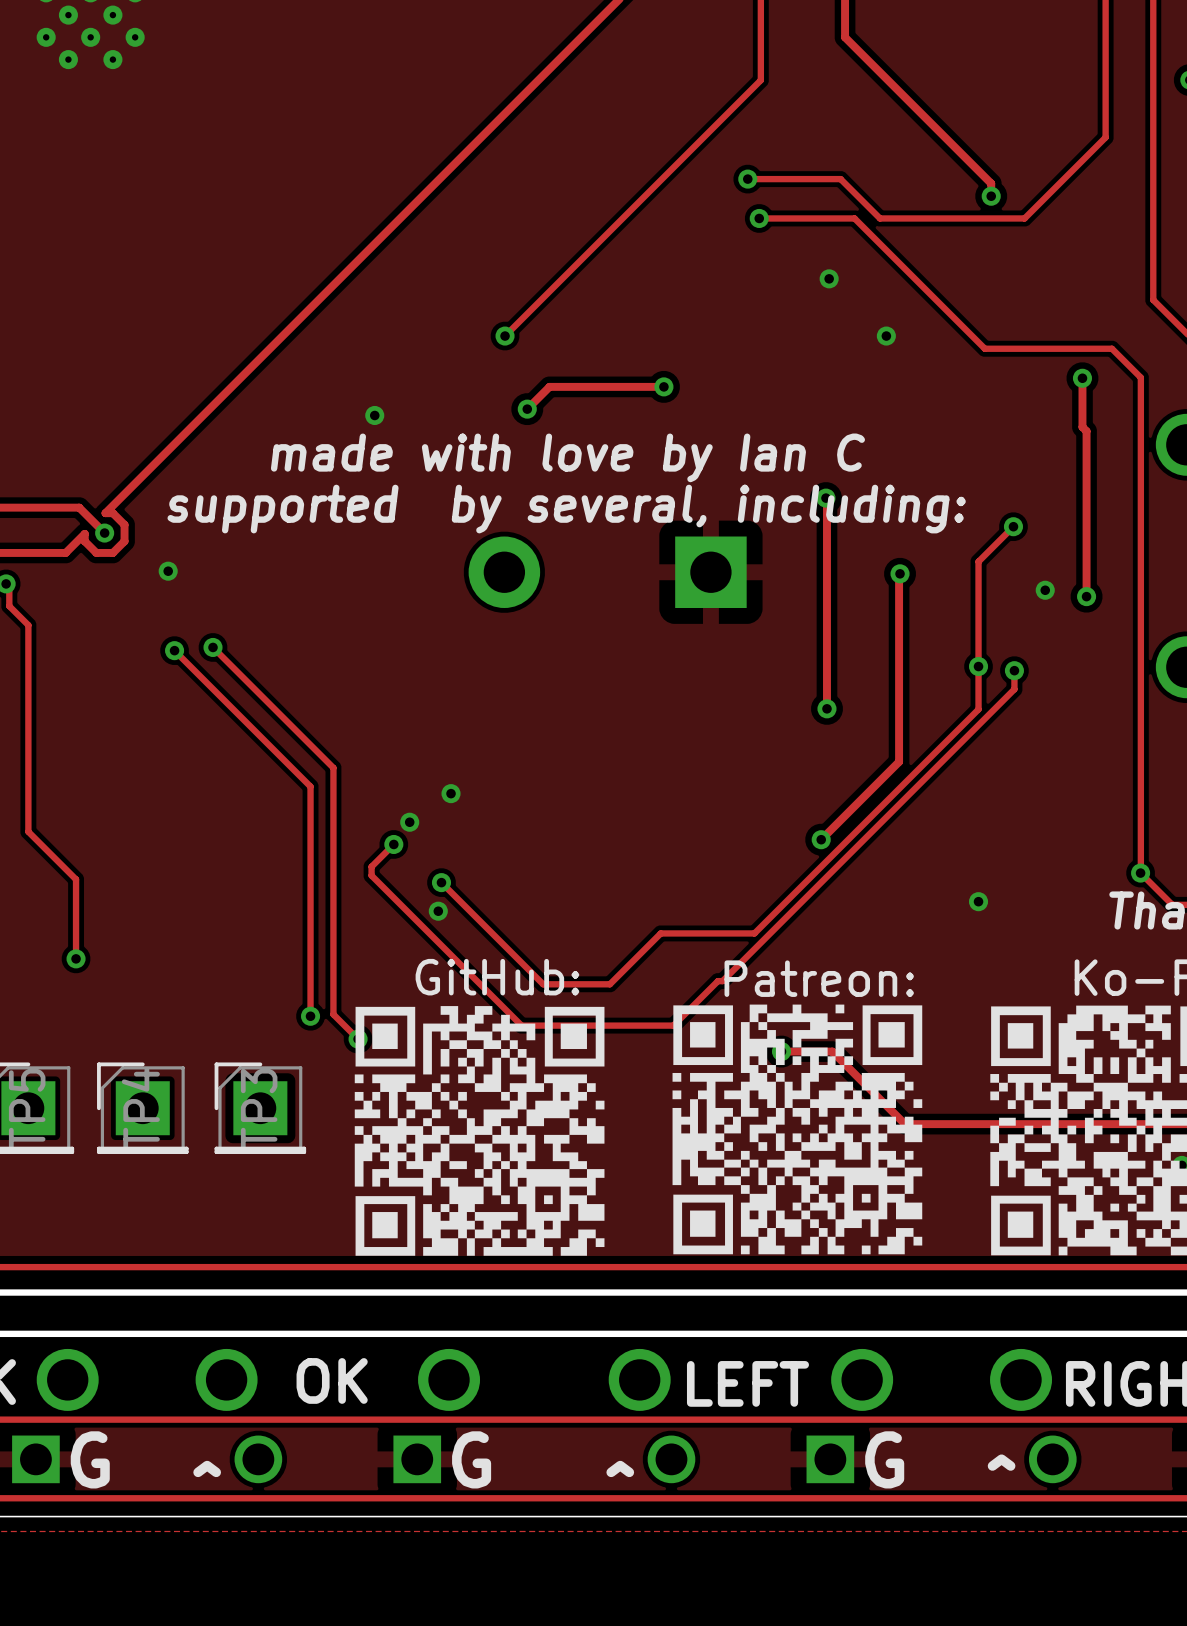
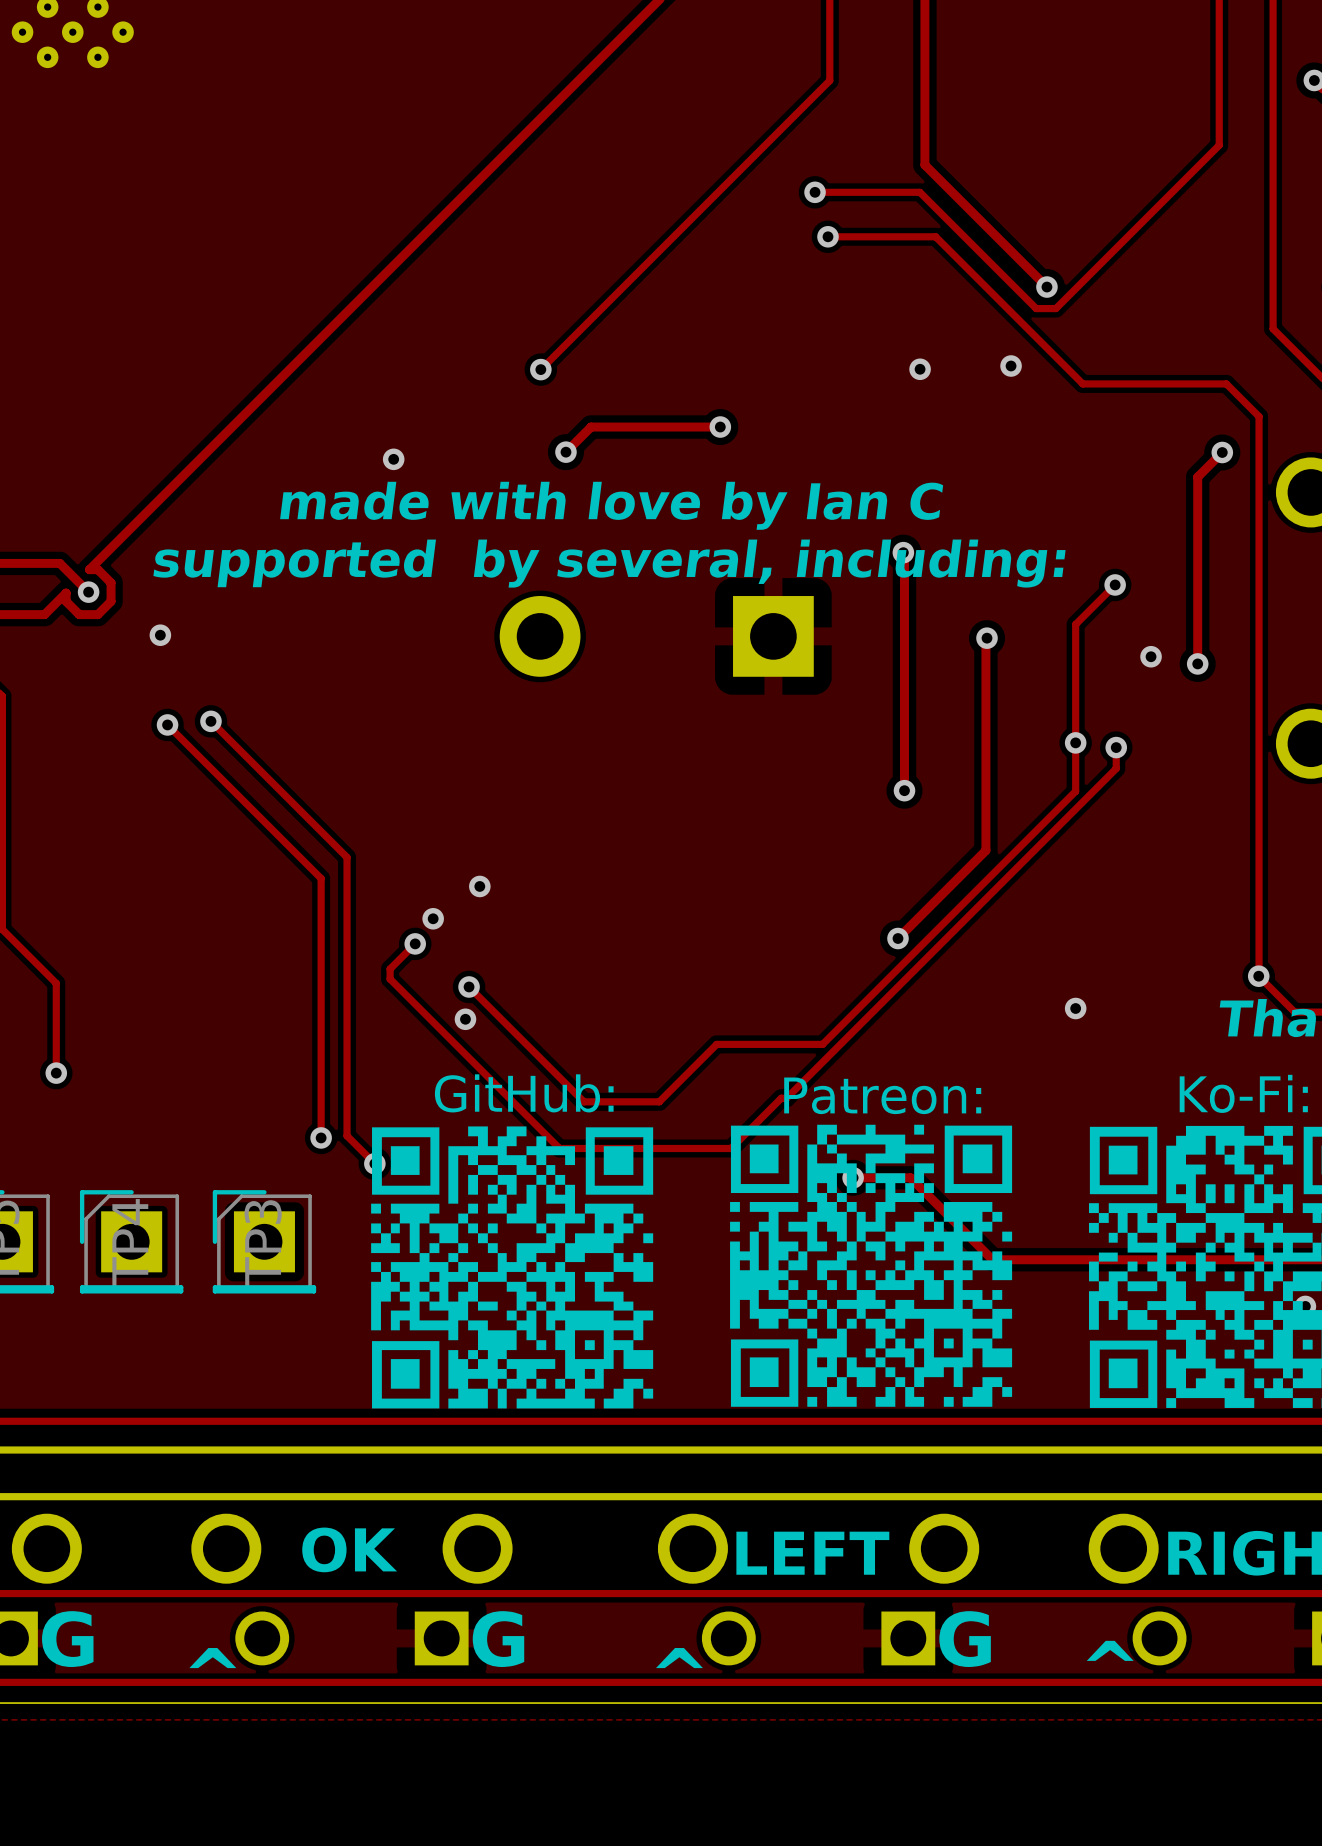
track: (845, 37) (991, 183) (991, 196) -> (924, 32) (924, 165) (1046, 287)
via: (991, 196) -> none
track: (880, 218) (1024, 218) -> (964, 236) (1036, 308) (1055, 308) (1127, 236)
via: none -> (1046, 287)
via: (829, 278) -> none
via: none -> (1011, 366)
via: none -> (920, 369)
via: (886, 336) -> none
track: (1082, 378) (1082, 427) (1086, 431) -> (1222, 452) (1197, 477)
via position: (1082, 378) -> (1222, 452)

